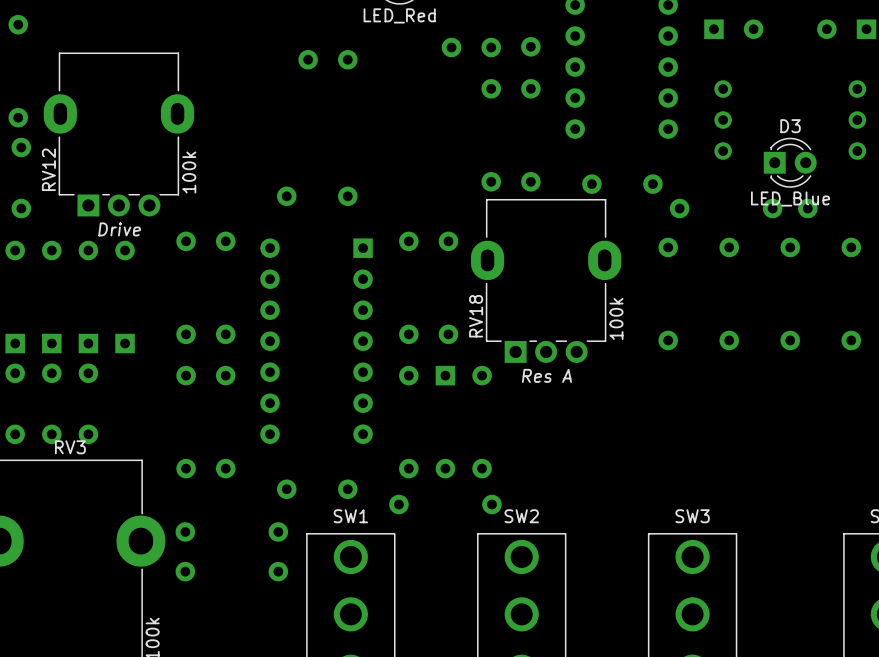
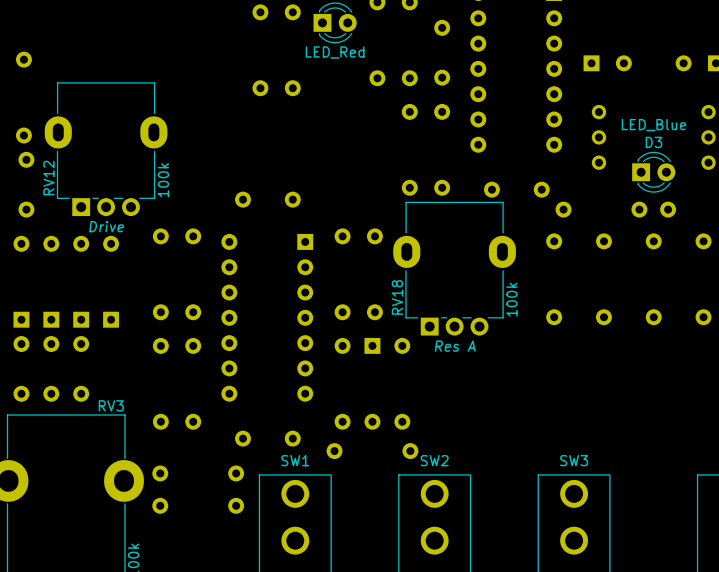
D3 value position: LED_Blue (790, 199) -> LED_Blue (653, 125)
RV3 name position: RV3 (70, 447) -> RV3 (111, 405)

